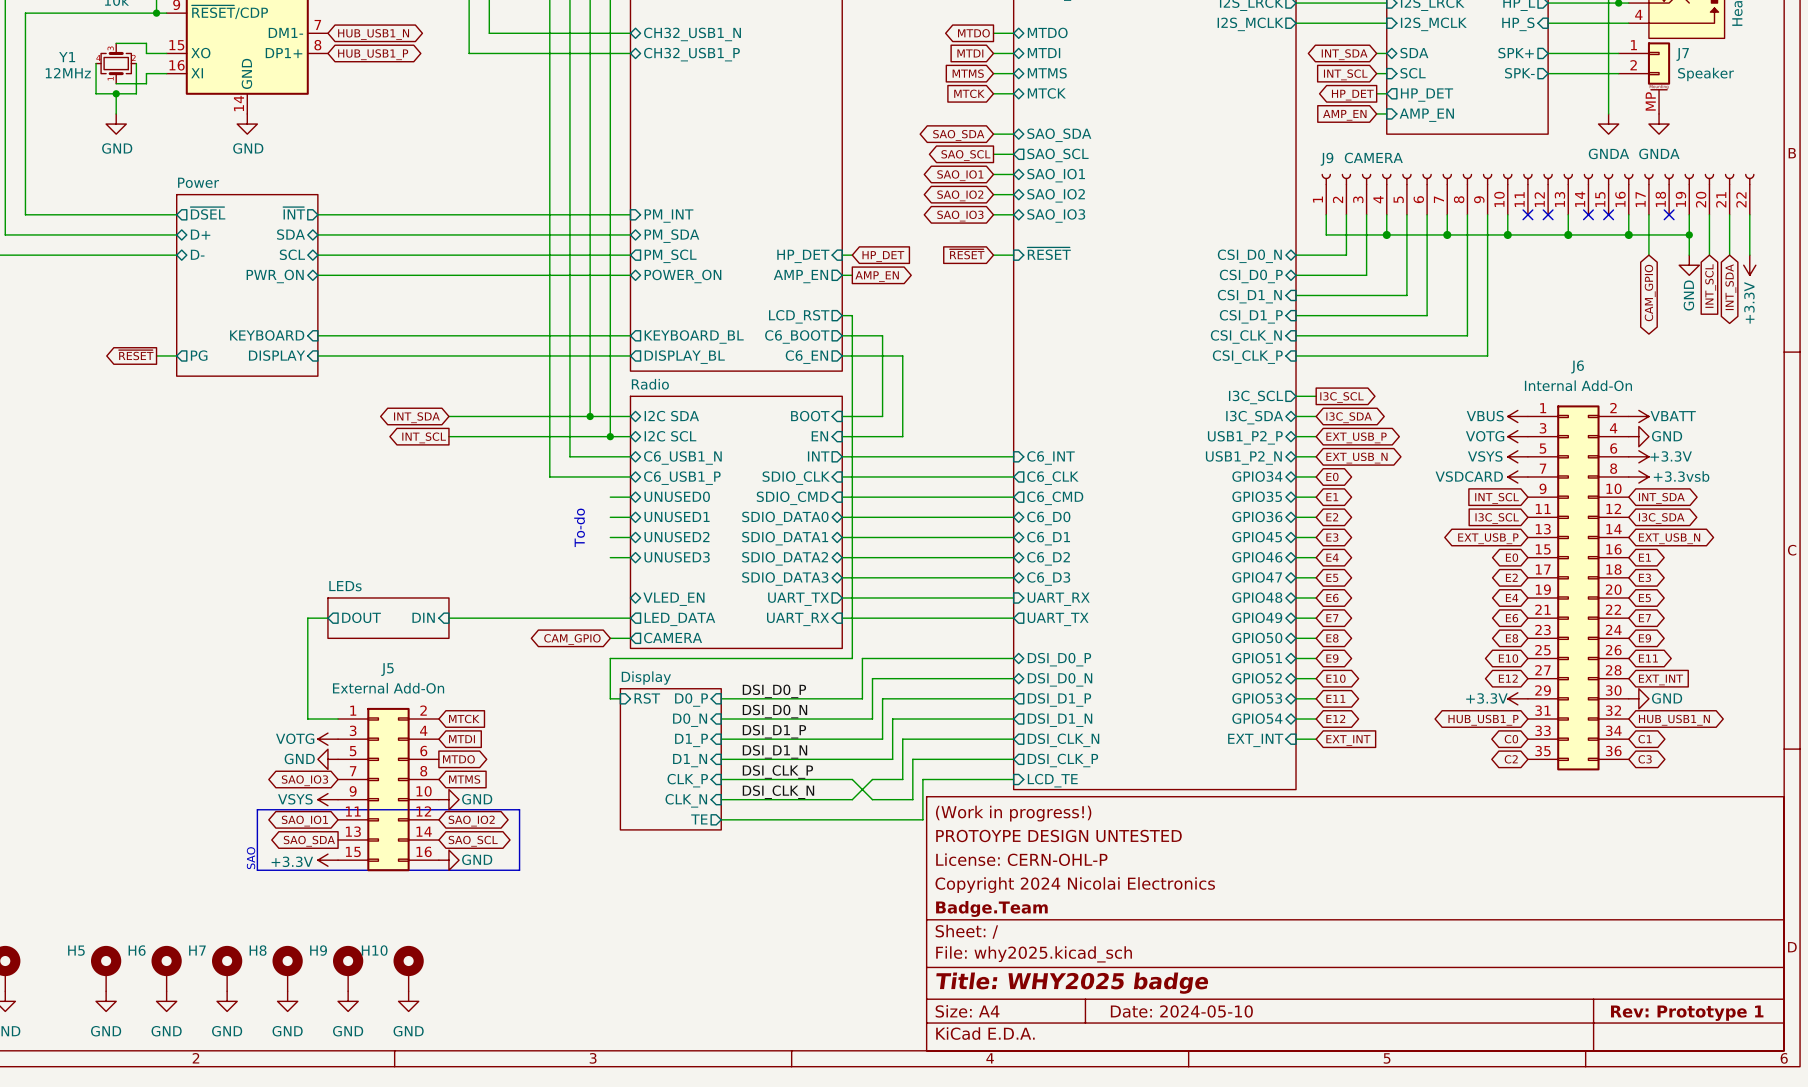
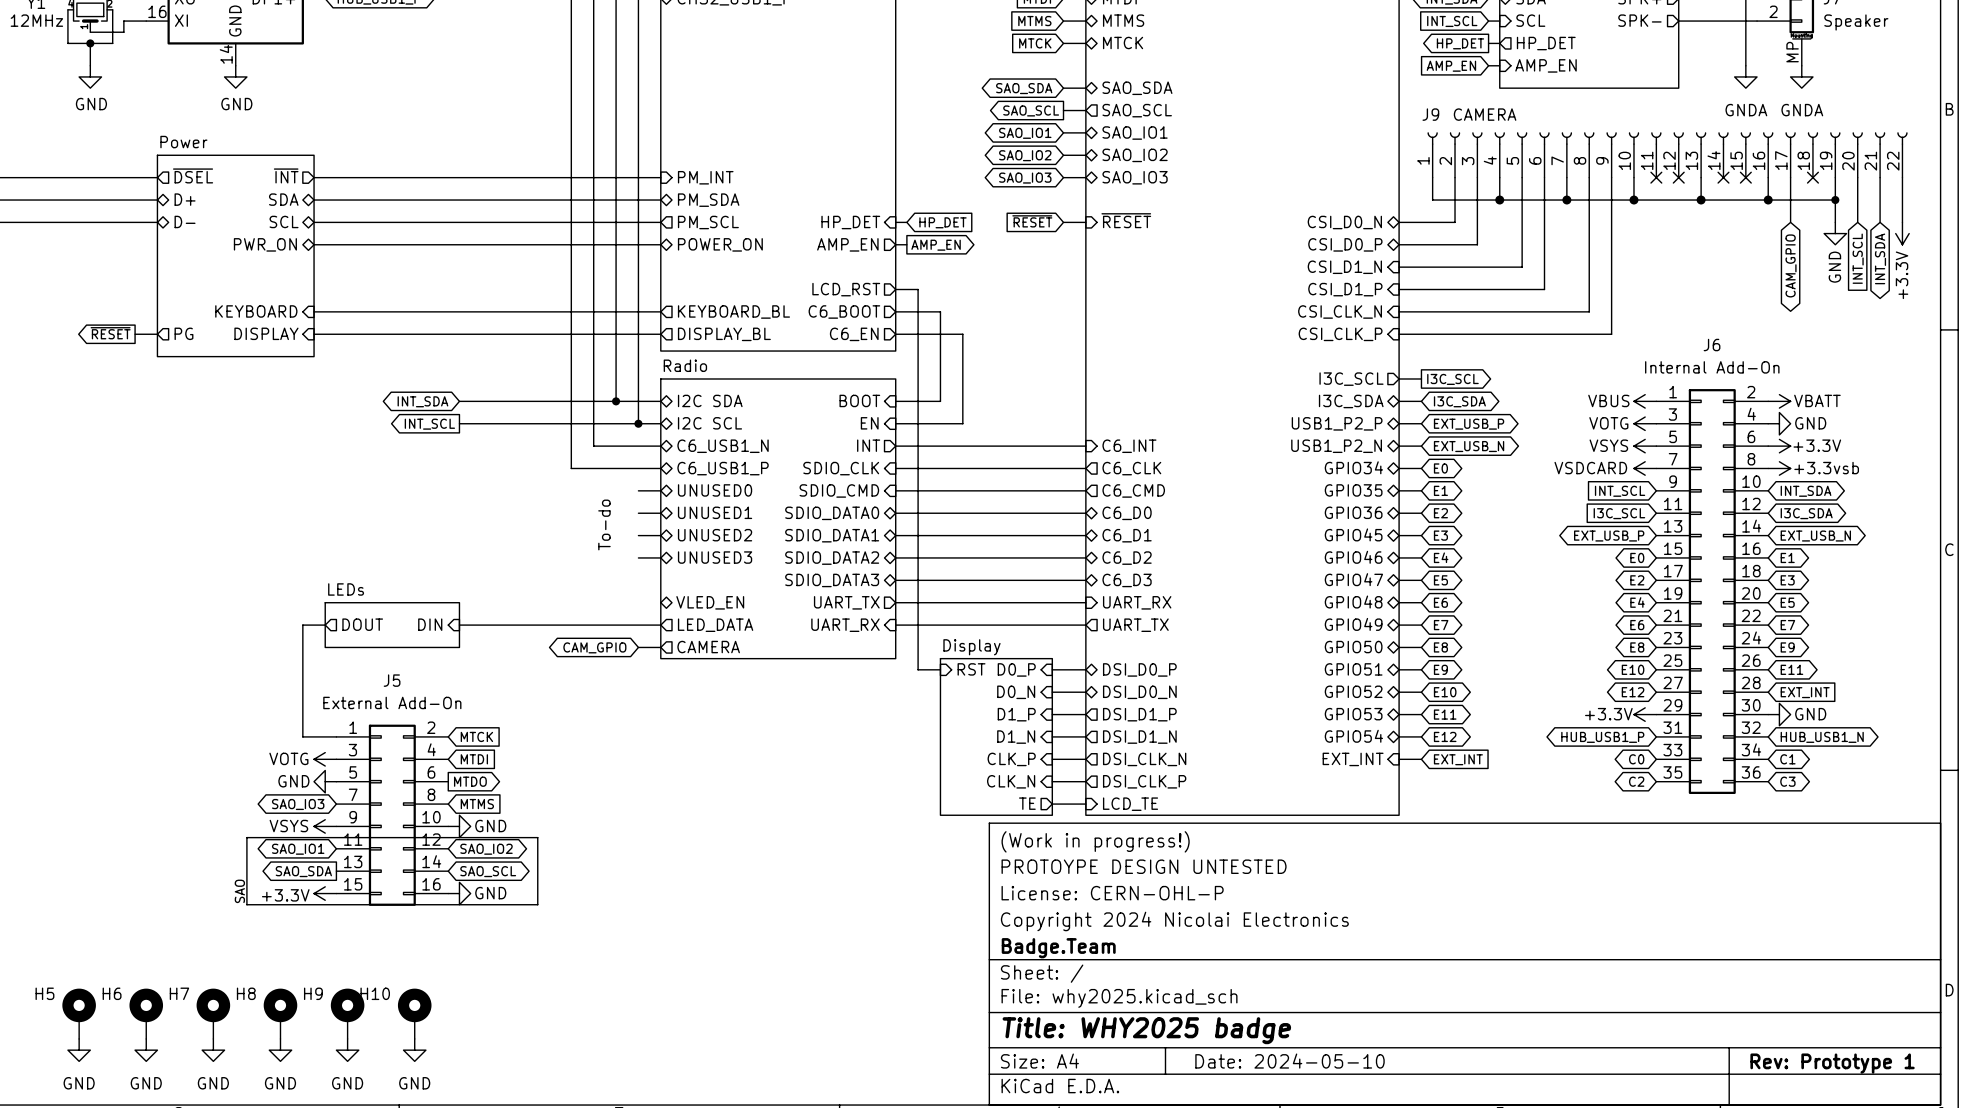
wire: (852, 315) (852, 658) (610, 658) (610, 698) (620, 698) -> (906, 289) (918, 289) (918, 669)
wire: (862, 658) (862, 698) (721, 698) -> none
wire: (882, 658) (983, 658) -> none
sheet pin: none -> RST (971, 669)
sheet pin: none -> D0_P (1016, 669)
wire: (983, 678) (872, 678) (872, 719) (721, 719) -> none
sheet pin: none -> D0_N (1016, 692)
label: DSI_D0_P (774, 691) -> none
sheet pin: RST (647, 698) -> none
wire: (983, 698) (882, 698) (882, 739) (721, 739) -> none
sheet pin: D0_P (691, 699) -> none
sheet pin: none -> D1_P (1016, 714)
label: DSI_D0_N (774, 711) -> none
sheet Display: none -> (996, 736)
wire: (983, 719) (892, 719) (892, 759) (721, 759) -> none
sheet pin: D0_N (690, 720) -> none
sheet pin: none -> D1_N (1016, 737)
label: DSI_D1_P (774, 731) -> none
wire: (983, 739) (902, 739) (902, 779) (872, 779) (852, 799) (721, 799) -> none
sheet pin: D1_P (691, 740) -> none
sheet pin: none -> CLK_P (1011, 759)
label: DSI_D1_N (774, 751) -> none
sheet Display: (670, 759) -> none
wire: (983, 759) (912, 759) (912, 799) (872, 799) (852, 779) (721, 779) -> none
sheet pin: D1_N (690, 760) -> none
sheet pin: none -> CLK_N (1011, 781)
label: DSI_CLK_P (777, 772) -> none
sheet pin: none -> TE (1027, 803)
wire: (983, 779) (922, 779) (922, 819) (721, 819) -> none
sheet pin: CLK_P (687, 780) -> none
label: DSI_CLK_N (778, 792) -> none
sheet pin: CLK_N (686, 800) -> none
sheet pin: TE (699, 819) -> none

